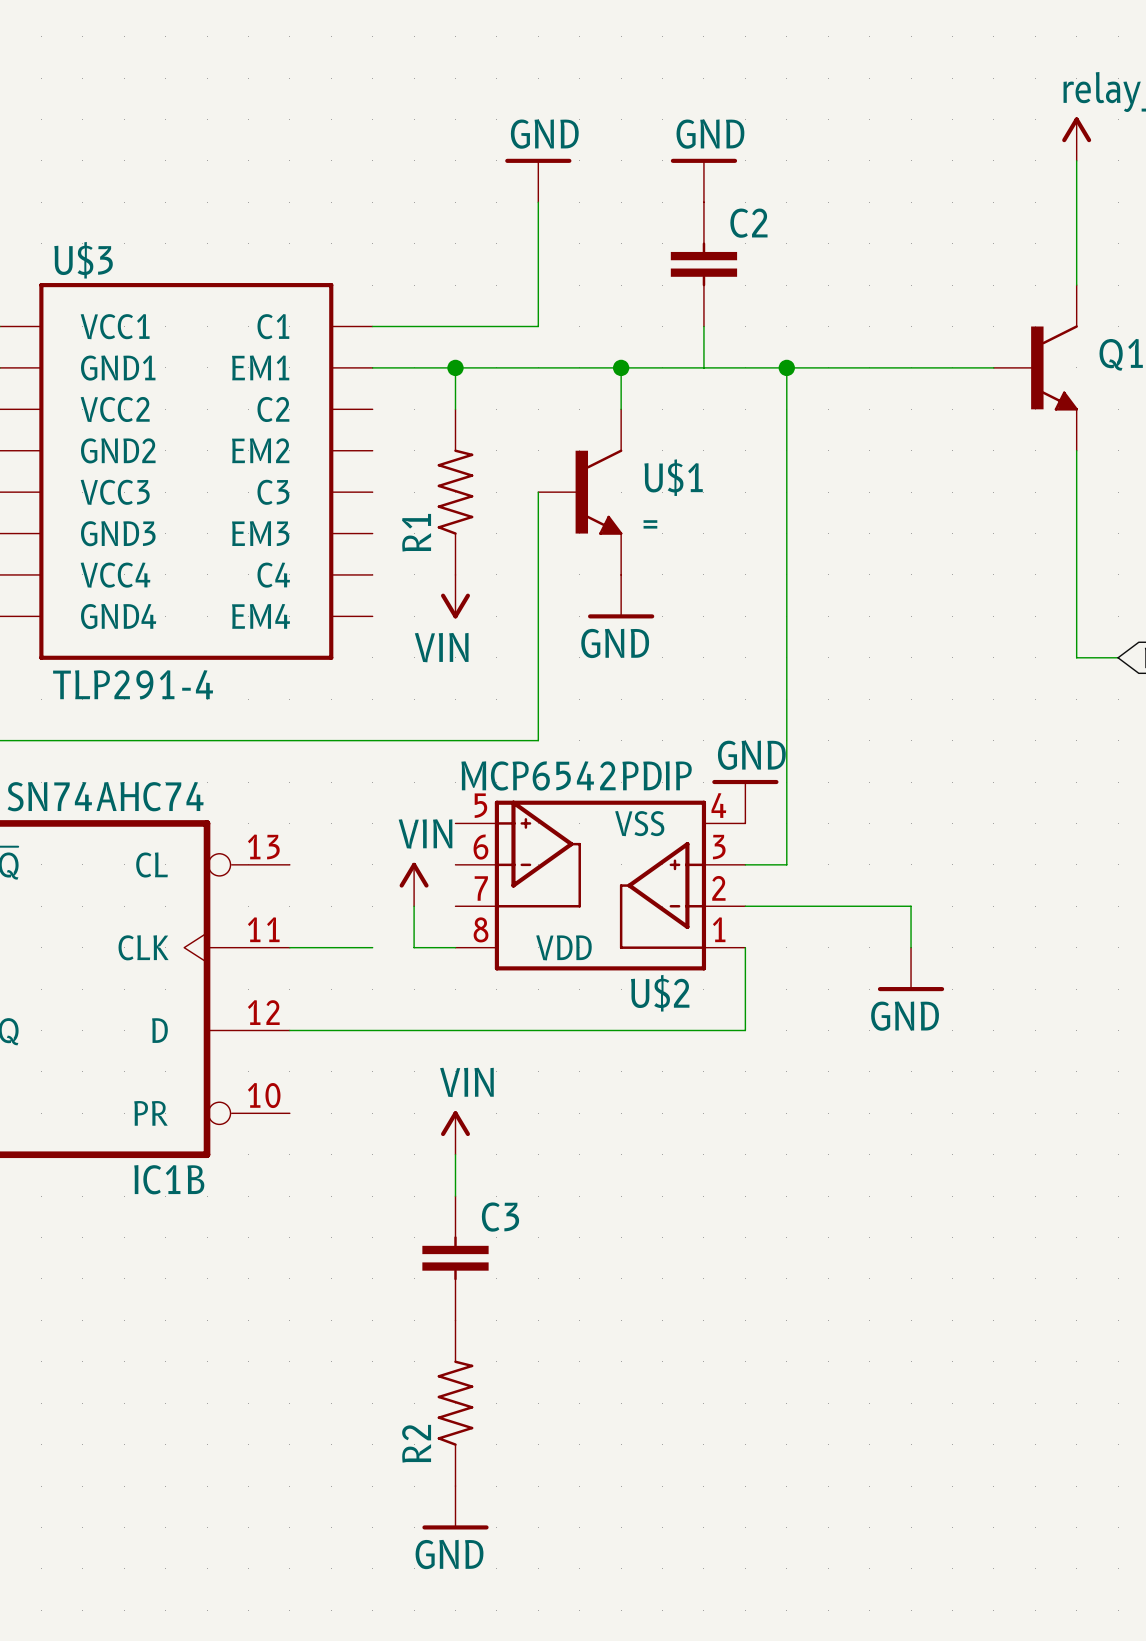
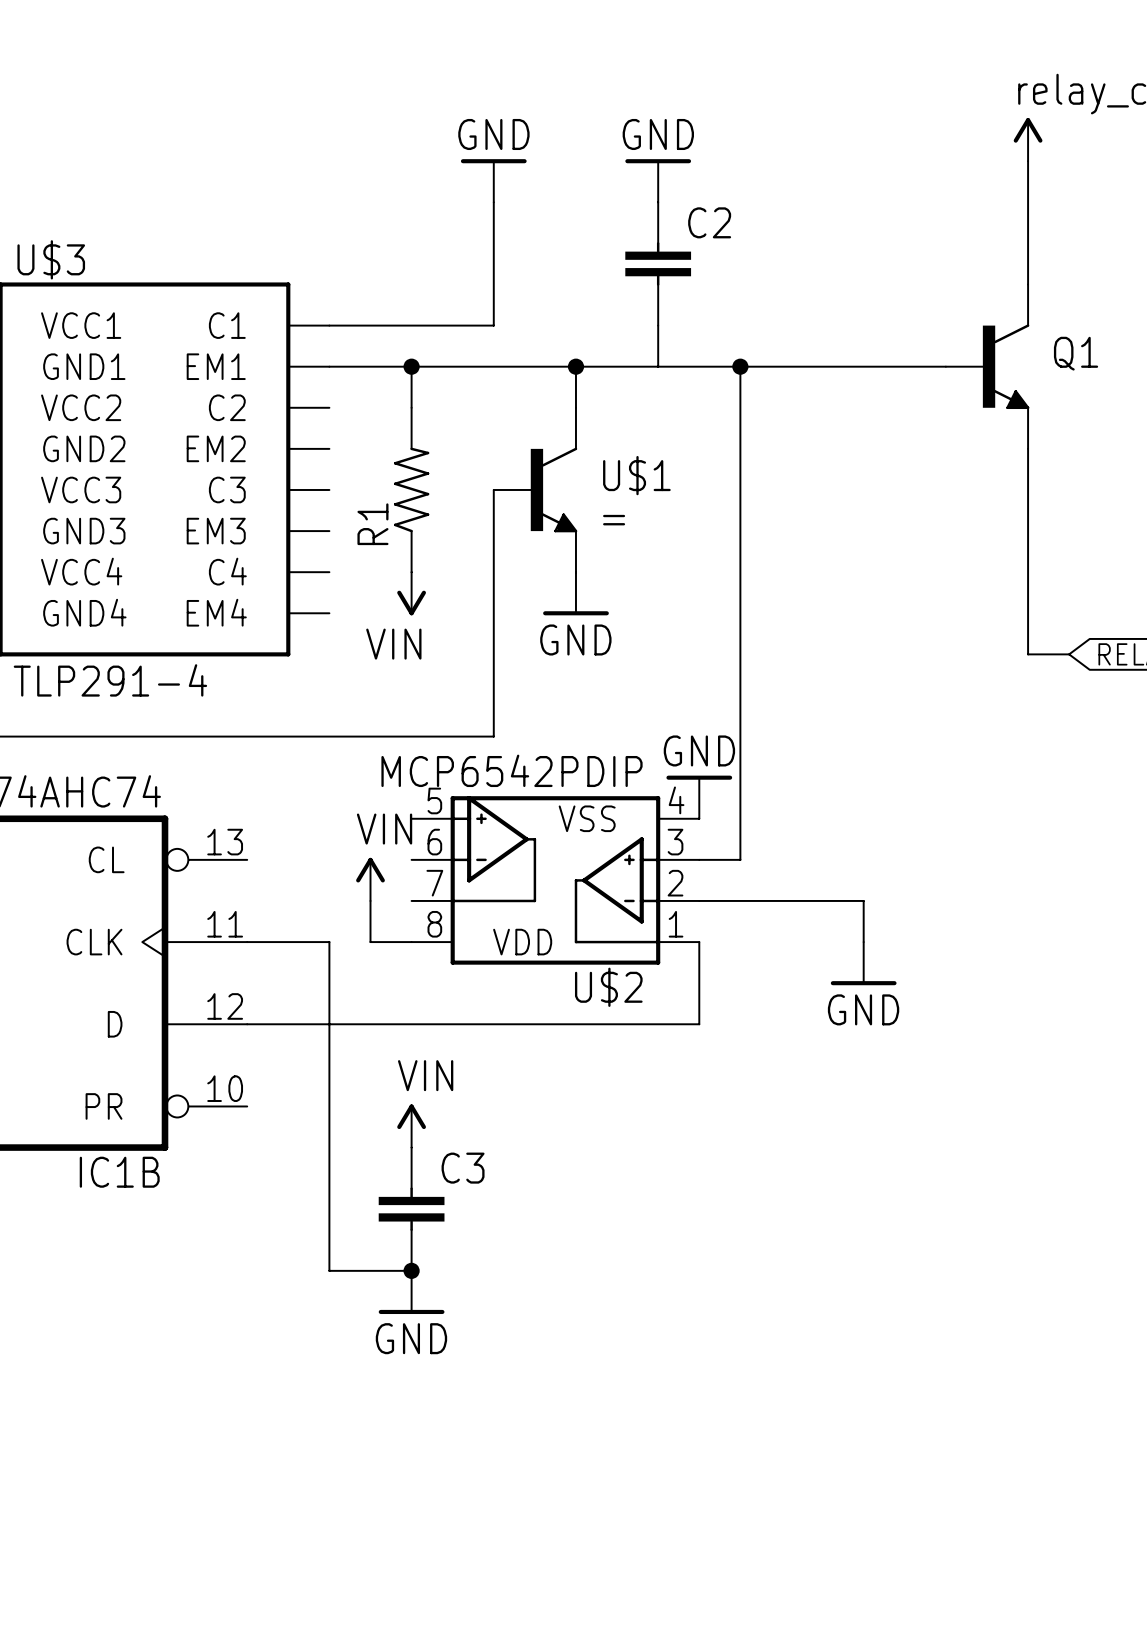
wire: none -> (329, 942) (329, 1270) (411, 1270)
C3 position: (455, 1258) -> (411, 1209)
junction: none -> (411, 1270)
R2: (455, 1403) -> none
power symbol position: GND (455, 1507) -> GND (411, 1292)

